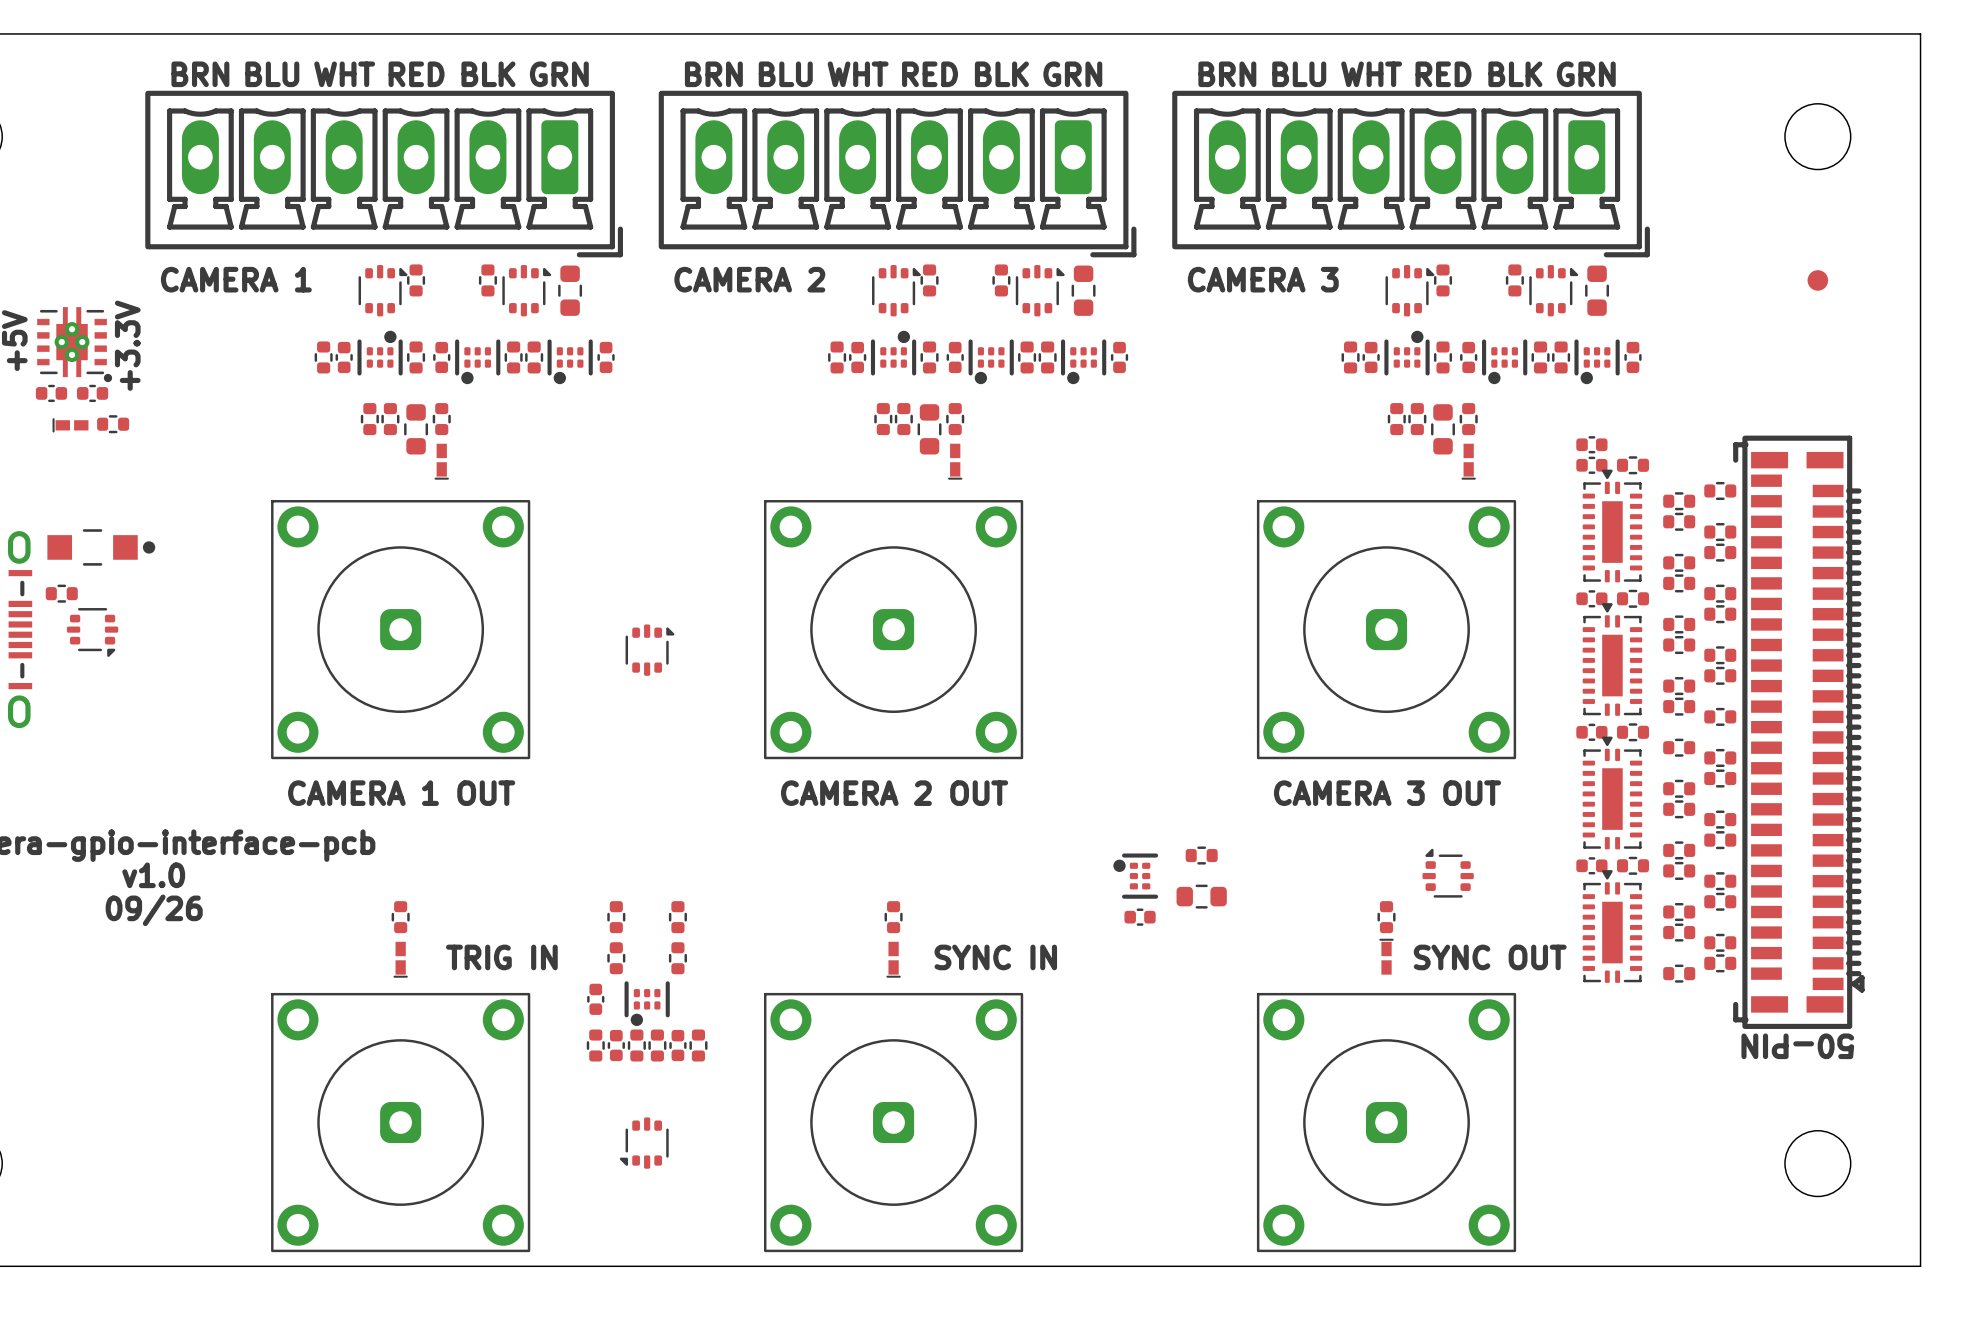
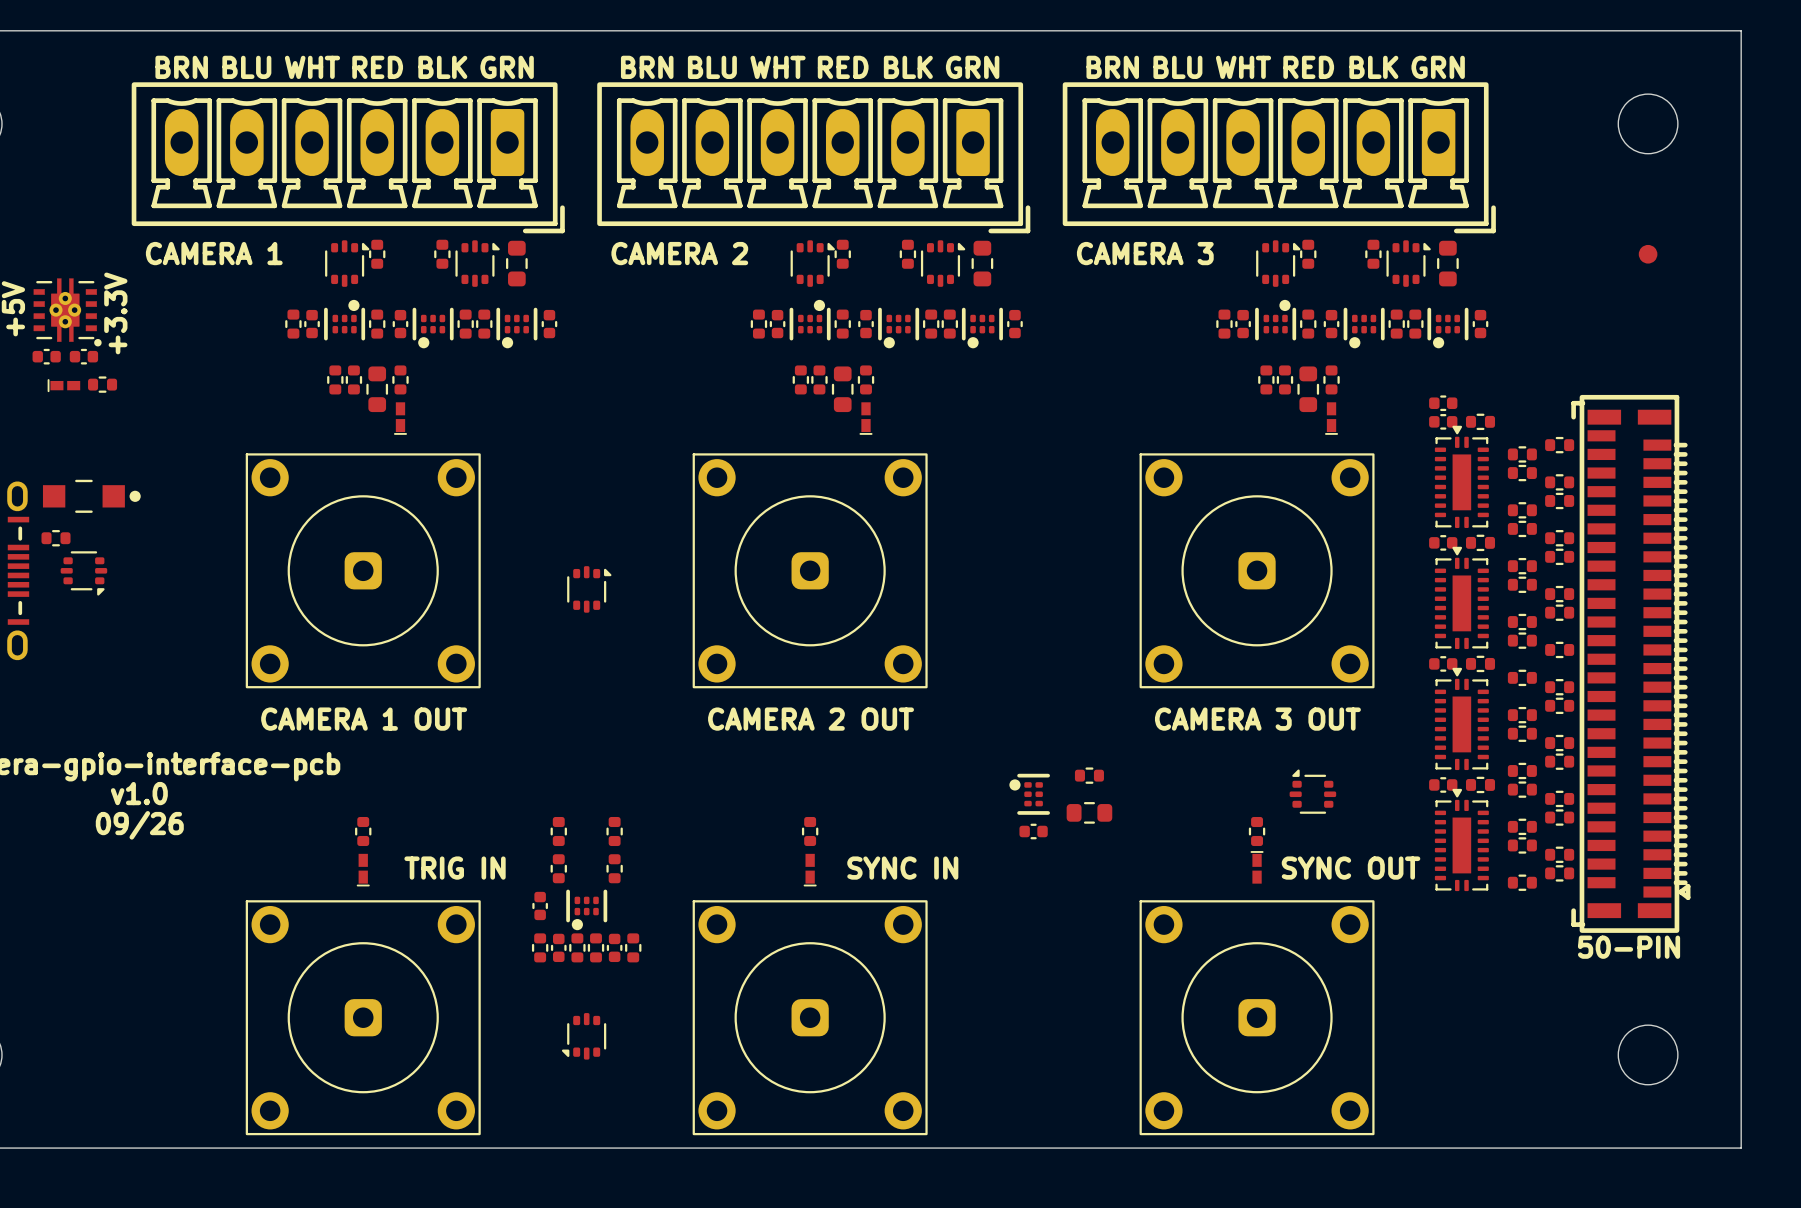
text rotation: 0° (1797, 1046) -> 180° (1629, 947)

